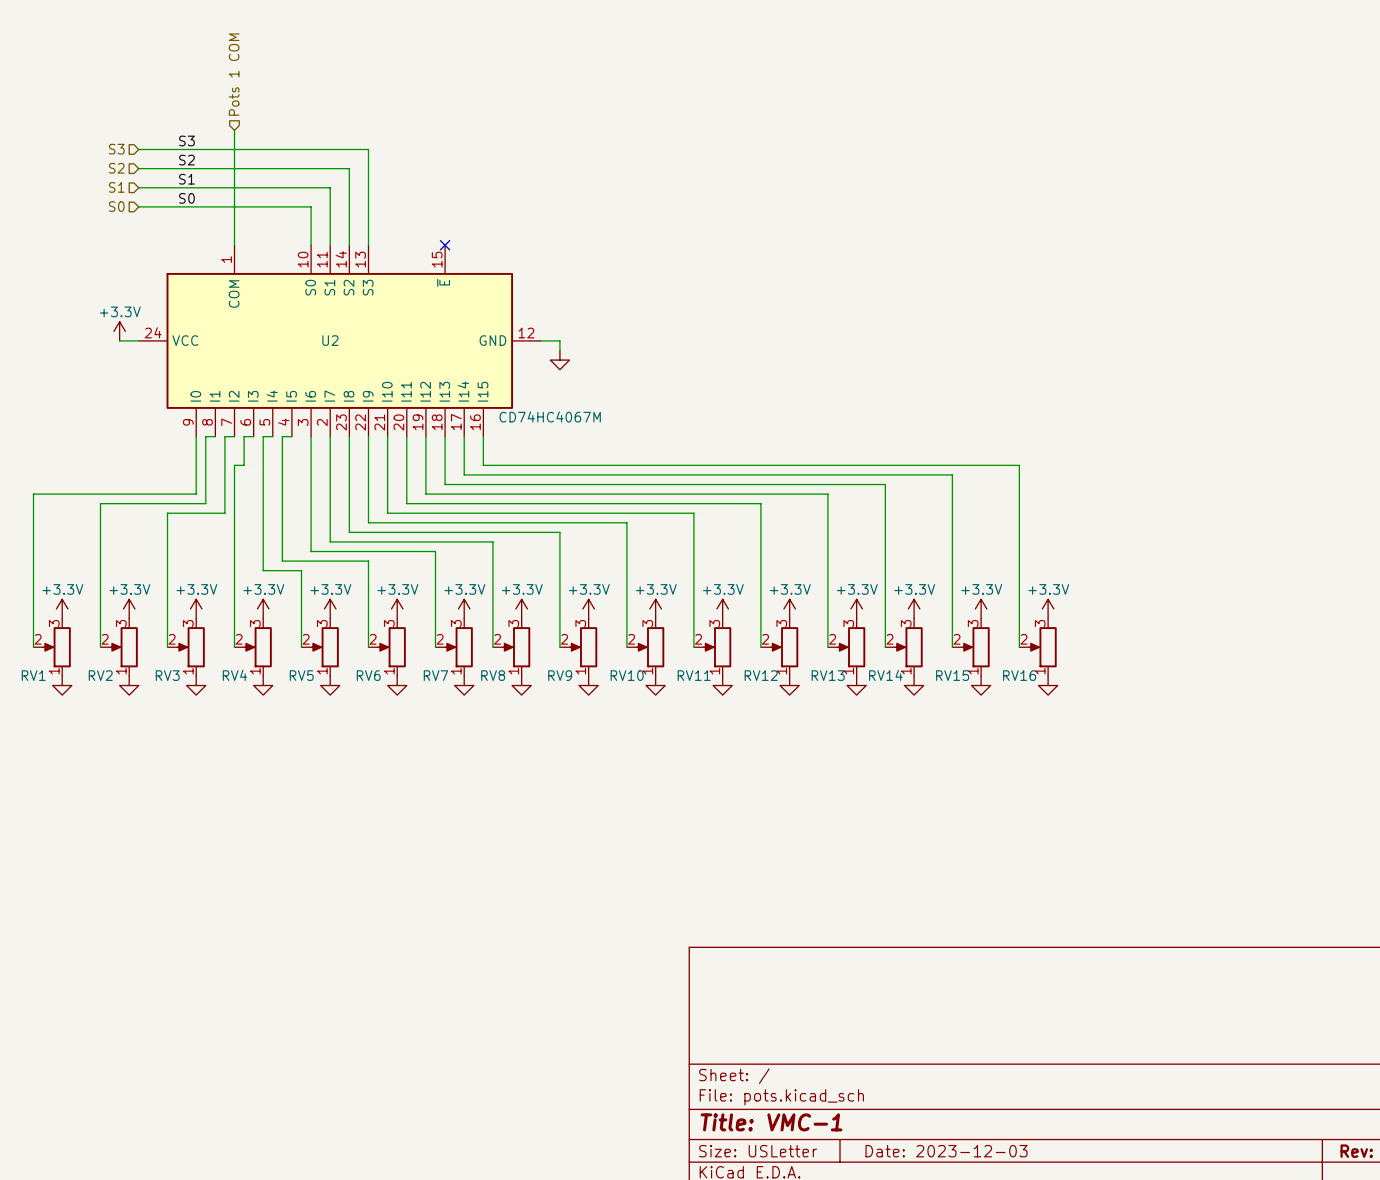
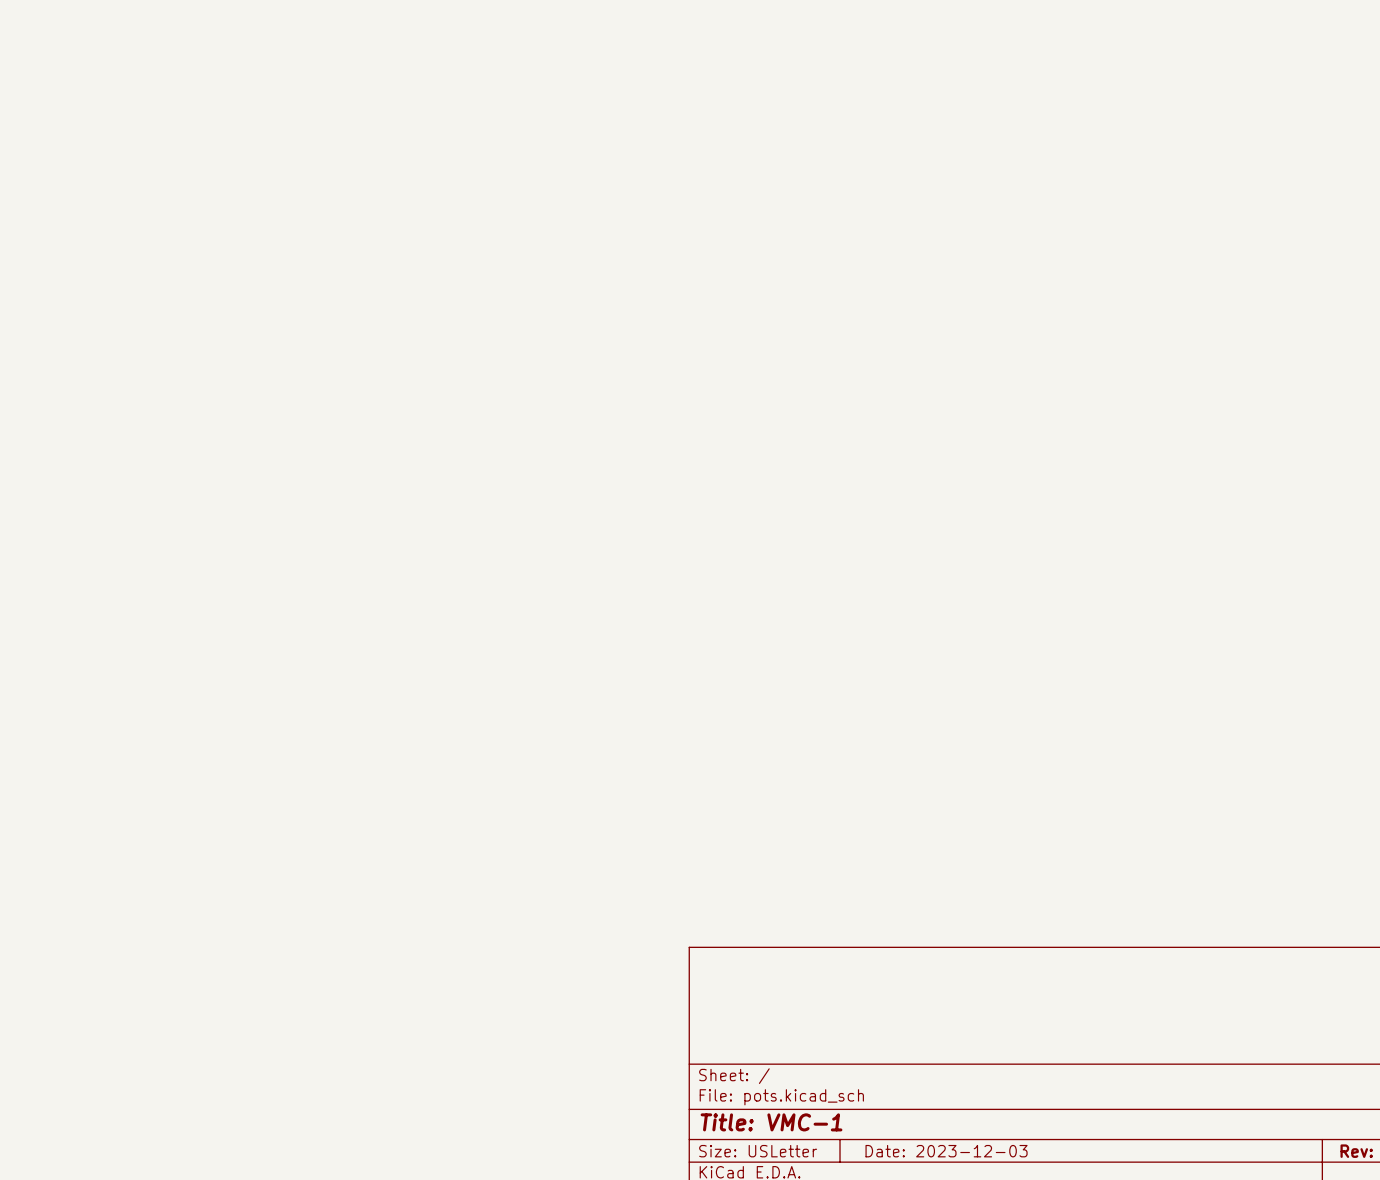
hierarchical label: Pots 1 COM (234, 74) -> none
wire: (234, 130) (234, 245) -> none
label: S3 (186, 140) -> none
hierarchical label: S3 (116, 149) -> none
wire: (138, 149) (368, 149) (368, 245) -> none
label: S2 (186, 160) -> none
hierarchical label: S2 (116, 168) -> none
wire: (138, 168) (349, 168) (349, 245) -> none
label: S1 (186, 179) -> none
hierarchical label: S1 (116, 187) -> none
wire: (138, 187) (330, 187) (330, 245) -> none
label: S0 (186, 198) -> none
hierarchical label: S0 (116, 206) -> none
wire: (138, 206) (311, 206) (311, 245) -> none
no-connect mark: (445, 245) -> none
power symbol: +3.3V (119, 331) -> none
wire: (119, 340) (138, 340) -> none
U2: CD74HC4067M (339, 340) -> none
wire: (540, 340) (559, 340) (559, 350) -> none
power symbol: (559, 360) -> none
wire: (196, 436) (196, 494) (33, 494) (33, 647) -> none
wire: (215, 436) (205, 436) (205, 503) (100, 503) (100, 647) -> none
wire: (234, 436) (224, 436) (224, 513) (167, 513) (167, 647) -> none
wire: (253, 436) (244, 436) (244, 465) (234, 465) (234, 647) -> none
wire: (272, 436) (263, 436) (263, 570) (301, 570) (301, 647) -> none
wire: (291, 436) (282, 436) (282, 561) (368, 561) (368, 647) -> none
wire: (311, 436) (311, 551) (435, 551) (435, 647) -> none
wire: (330, 436) (330, 541) (492, 541) (492, 647) -> none
wire: (349, 436) (349, 532) (559, 532) (559, 647) -> none
wire: (368, 436) (368, 522) (626, 522) (626, 647) -> none
wire: (387, 436) (387, 513) (693, 513) (693, 647) -> none
wire: (406, 436) (406, 503) (760, 503) (760, 647) -> none
wire: (425, 436) (425, 494) (827, 494) (827, 647) -> none
wire: (445, 436) (445, 484) (885, 484) (885, 647) -> none
wire: (464, 436) (464, 474) (952, 474) (952, 647) -> none
wire: (483, 436) (483, 465) (1019, 465) (1019, 647) -> none
power symbol: +3.3V (62, 608) -> none
power symbol: +3.3V (129, 608) -> none
power symbol: +3.3V (196, 608) -> none
power symbol: +3.3V (263, 608) -> none
power symbol: +3.3V (330, 608) -> none
power symbol: +3.3V (397, 608) -> none
power symbol: +3.3V (464, 608) -> none
power symbol: +3.3V (521, 608) -> none
power symbol: +3.3V (588, 608) -> none
power symbol: +3.3V (655, 608) -> none
power symbol: +3.3V (722, 608) -> none
power symbol: +3.3V (789, 608) -> none
power symbol: +3.3V (856, 608) -> none
power symbol: +3.3V (914, 608) -> none
power symbol: +3.3V (981, 608) -> none
power symbol: +3.3V (1048, 608) -> none
RV1: (52, 647) -> none
RV2: (119, 647) -> none
RV3: (186, 647) -> none
RV4: (253, 647) -> none
RV5: (320, 647) -> none
RV6: (387, 647) -> none
RV7: (454, 647) -> none
RV8: (511, 647) -> none
RV9: (578, 647) -> none
RV10: (645, 647) -> none
RV11: (712, 647) -> none
RV12: (779, 647) -> none
RV13: (846, 647) -> none
RV14: (904, 647) -> none
RV15: (971, 647) -> none
RV16: (1038, 647) -> none
power symbol: (62, 685) -> none
power symbol: (129, 685) -> none
power symbol: (196, 685) -> none
power symbol: (263, 685) -> none
power symbol: (330, 685) -> none
power symbol: (397, 685) -> none
power symbol: (464, 685) -> none
power symbol: (521, 685) -> none
power symbol: (588, 685) -> none
power symbol: (655, 685) -> none
power symbol: (722, 685) -> none
power symbol: (789, 685) -> none
power symbol: (856, 685) -> none
power symbol: (914, 685) -> none
power symbol: (981, 685) -> none
power symbol: (1048, 685) -> none

